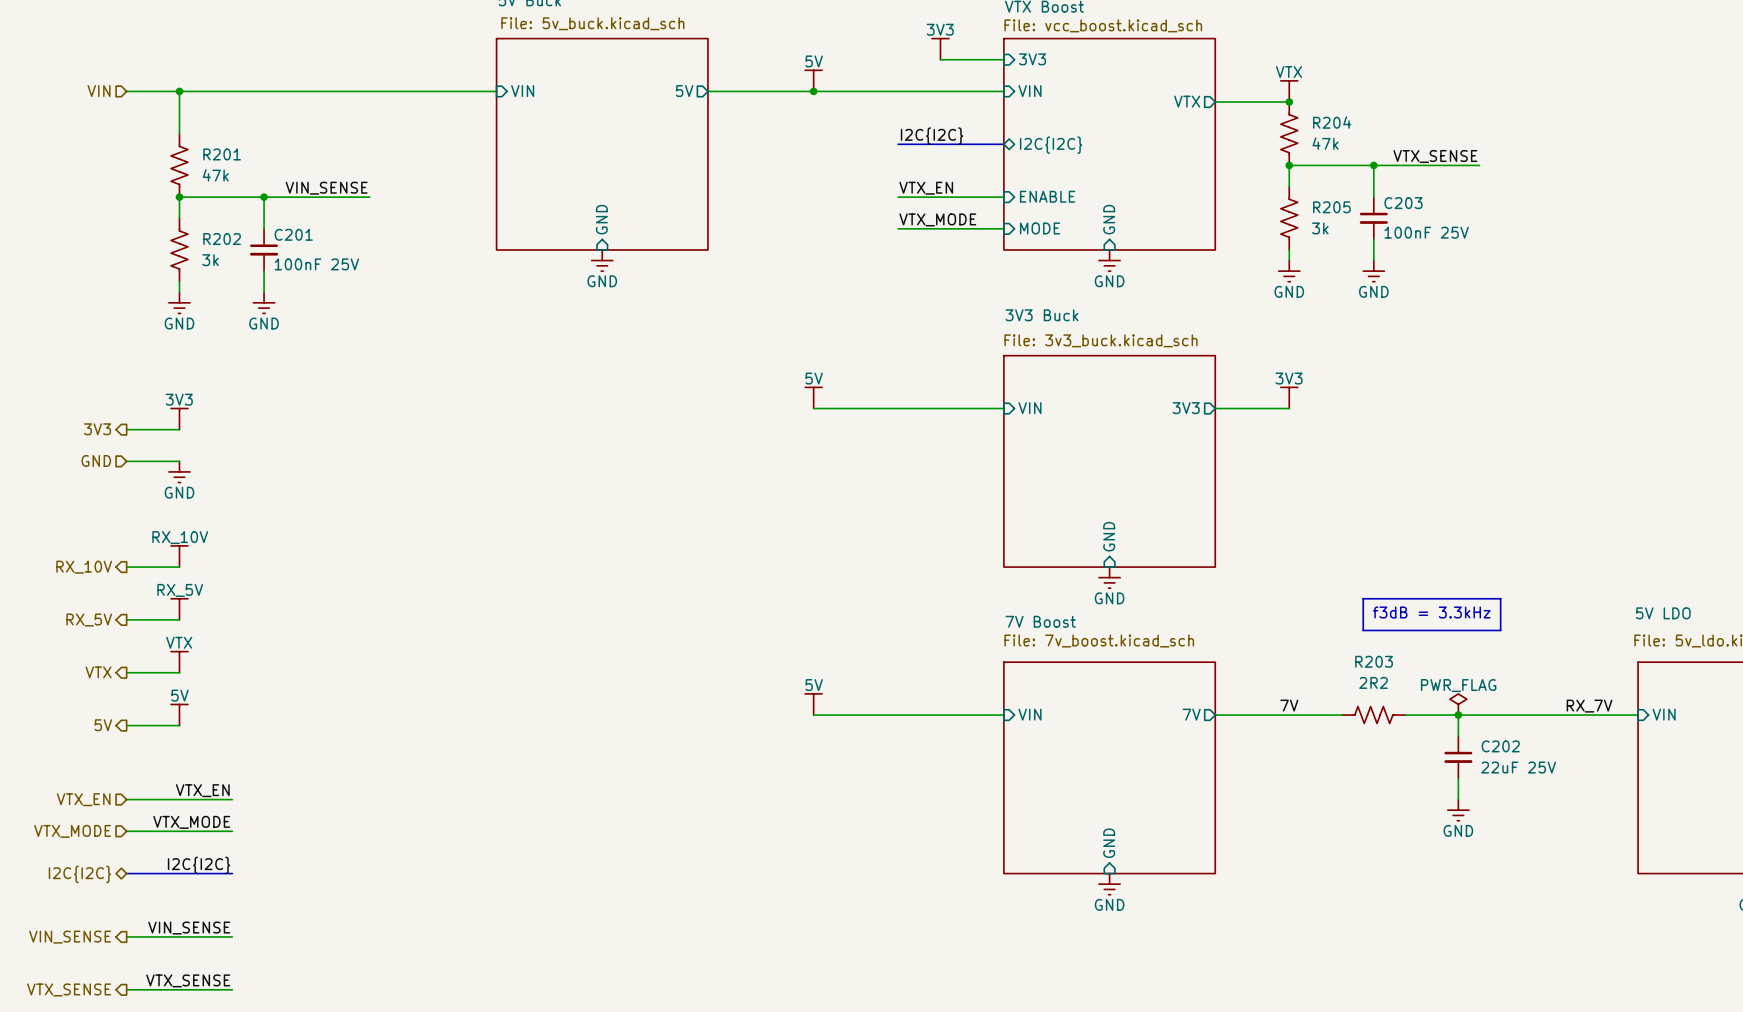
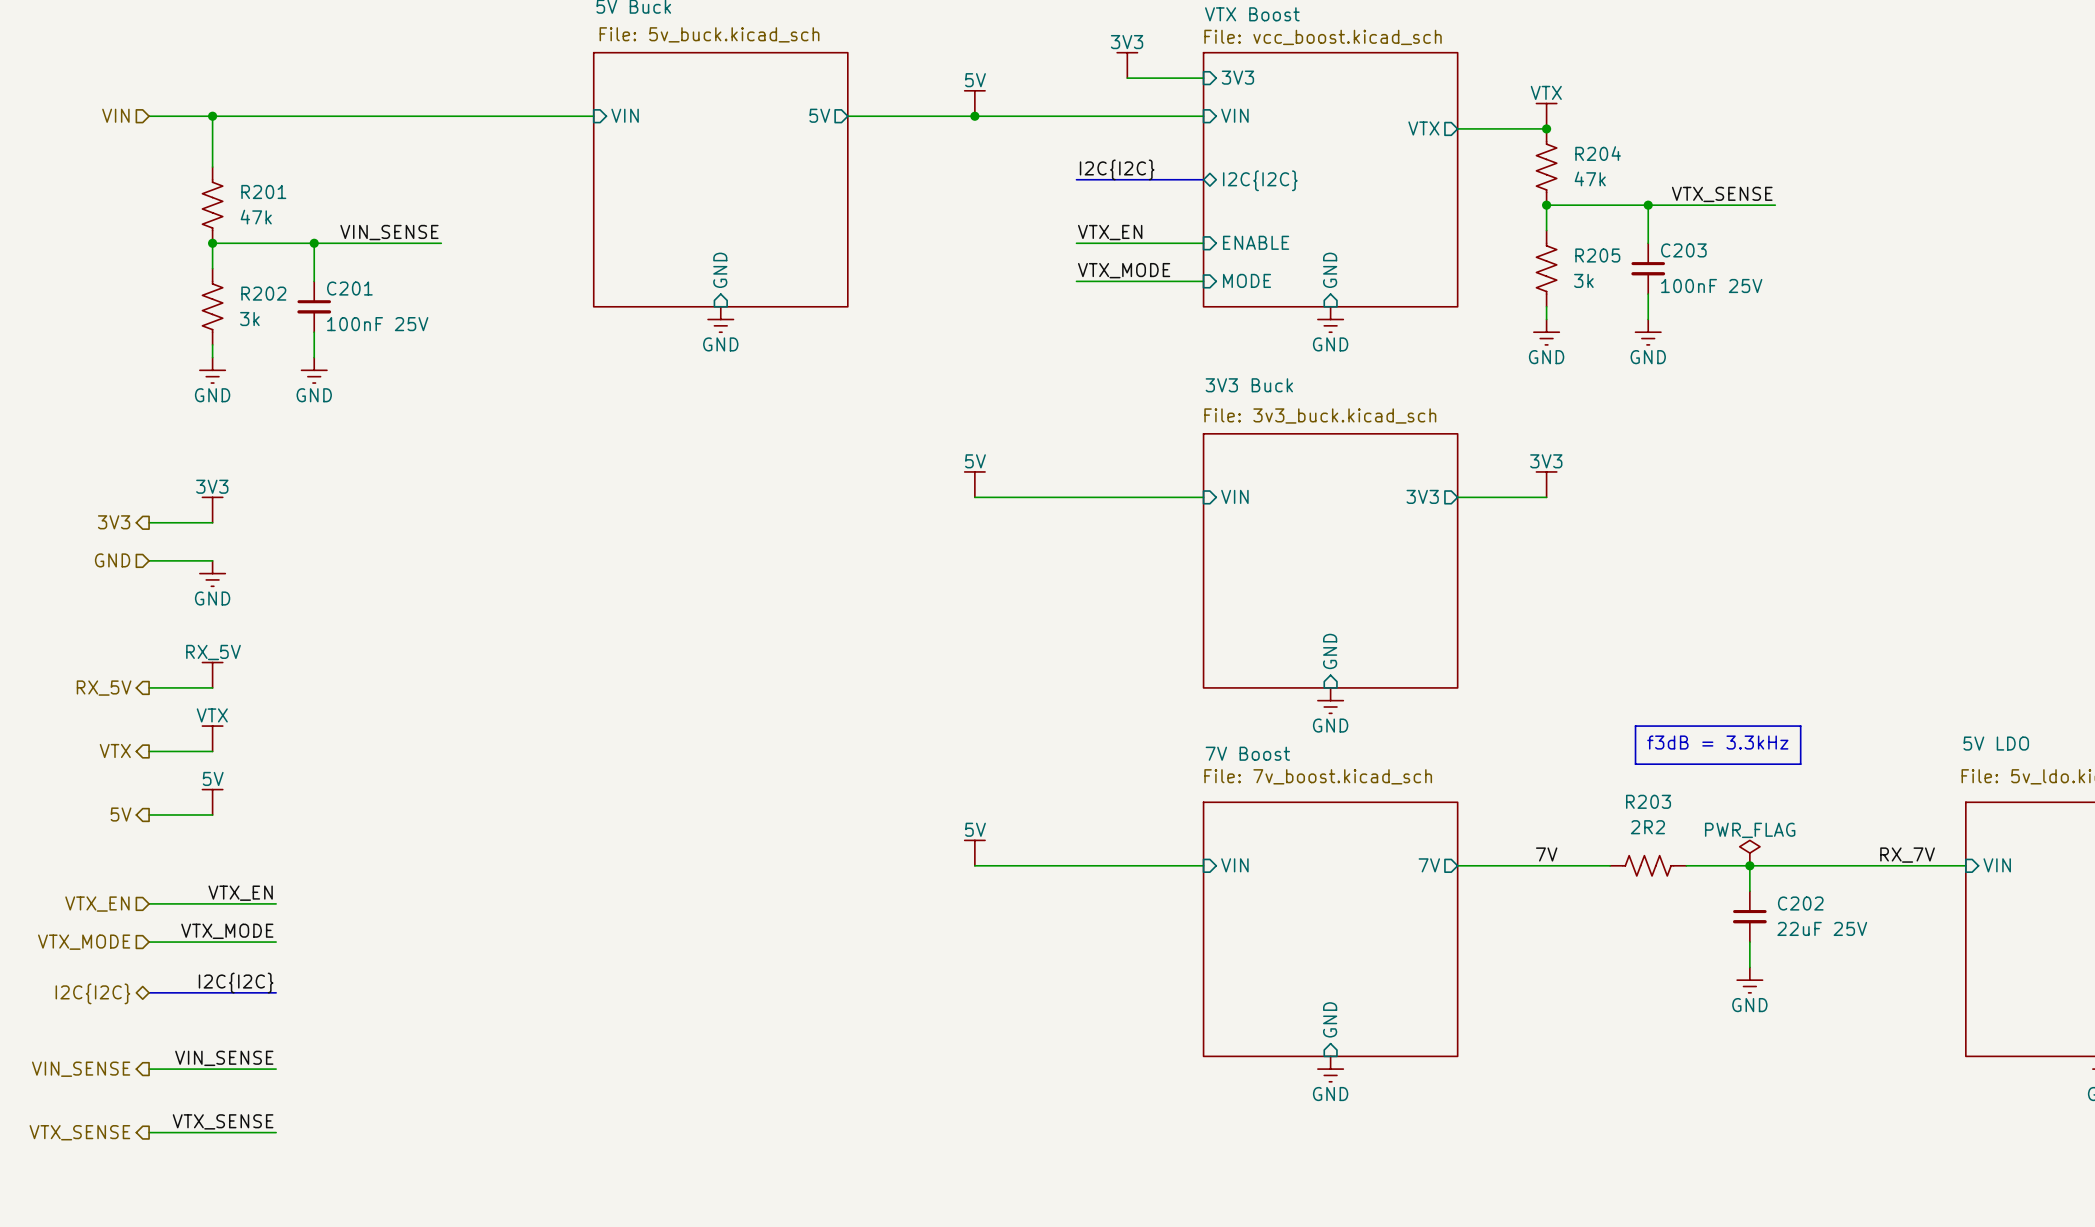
power symbol: RX_10V (179, 556) -> RX_5V (212, 675)
hierarchical label: RX_10V (84, 567) -> RX_5V (104, 688)
power symbol: RX_5V (179, 609) -> VTX (212, 738)
hierarchical label: RX_5V (89, 620) -> VTX (115, 750)
power symbol: VTX (179, 662) -> 5V (212, 802)
hierarchical label: VTX (98, 672) -> 5V (121, 814)
power symbol: 5V (179, 715) -> none
hierarchical label: 5V (103, 725) -> none
wire: (126, 725) (179, 725) -> none
label position: VTX_EN (202, 790) -> VTX_EN (240, 893)
hierarchical label position: VTX_EN (83, 799) -> VTX_EN (97, 904)
wire: (126, 799) (232, 799) -> (149, 903) (276, 903)
label position: VTX_MODE (191, 822) -> VTX_MODE (227, 931)
hierarchical label position: VTX_MODE (72, 831) -> VTX_MODE (84, 942)
wire: (126, 831) (232, 831) -> (149, 942) (276, 942)
label position: I2C{I2C} (199, 865) -> I2C{I2C} (236, 983)
bus: (126, 873) (232, 873) -> (149, 992) (276, 992)
hierarchical label position: I2C{I2C} (79, 874) -> I2C{I2C} (92, 993)
label: none -> VIN_SENSE (224, 1058)
hierarchical label: none -> VIN_SENSE (81, 1069)
label: VIN_SENSE (189, 928) -> VTX_SENSE (223, 1121)
hierarchical label: VIN_SENSE (70, 937) -> VTX_SENSE (79, 1132)
label: VTX_SENSE (188, 980) -> none
hierarchical label: VTX_SENSE (69, 989) -> none
wire: (126, 989) (232, 989) -> (149, 1069) (276, 1069)

